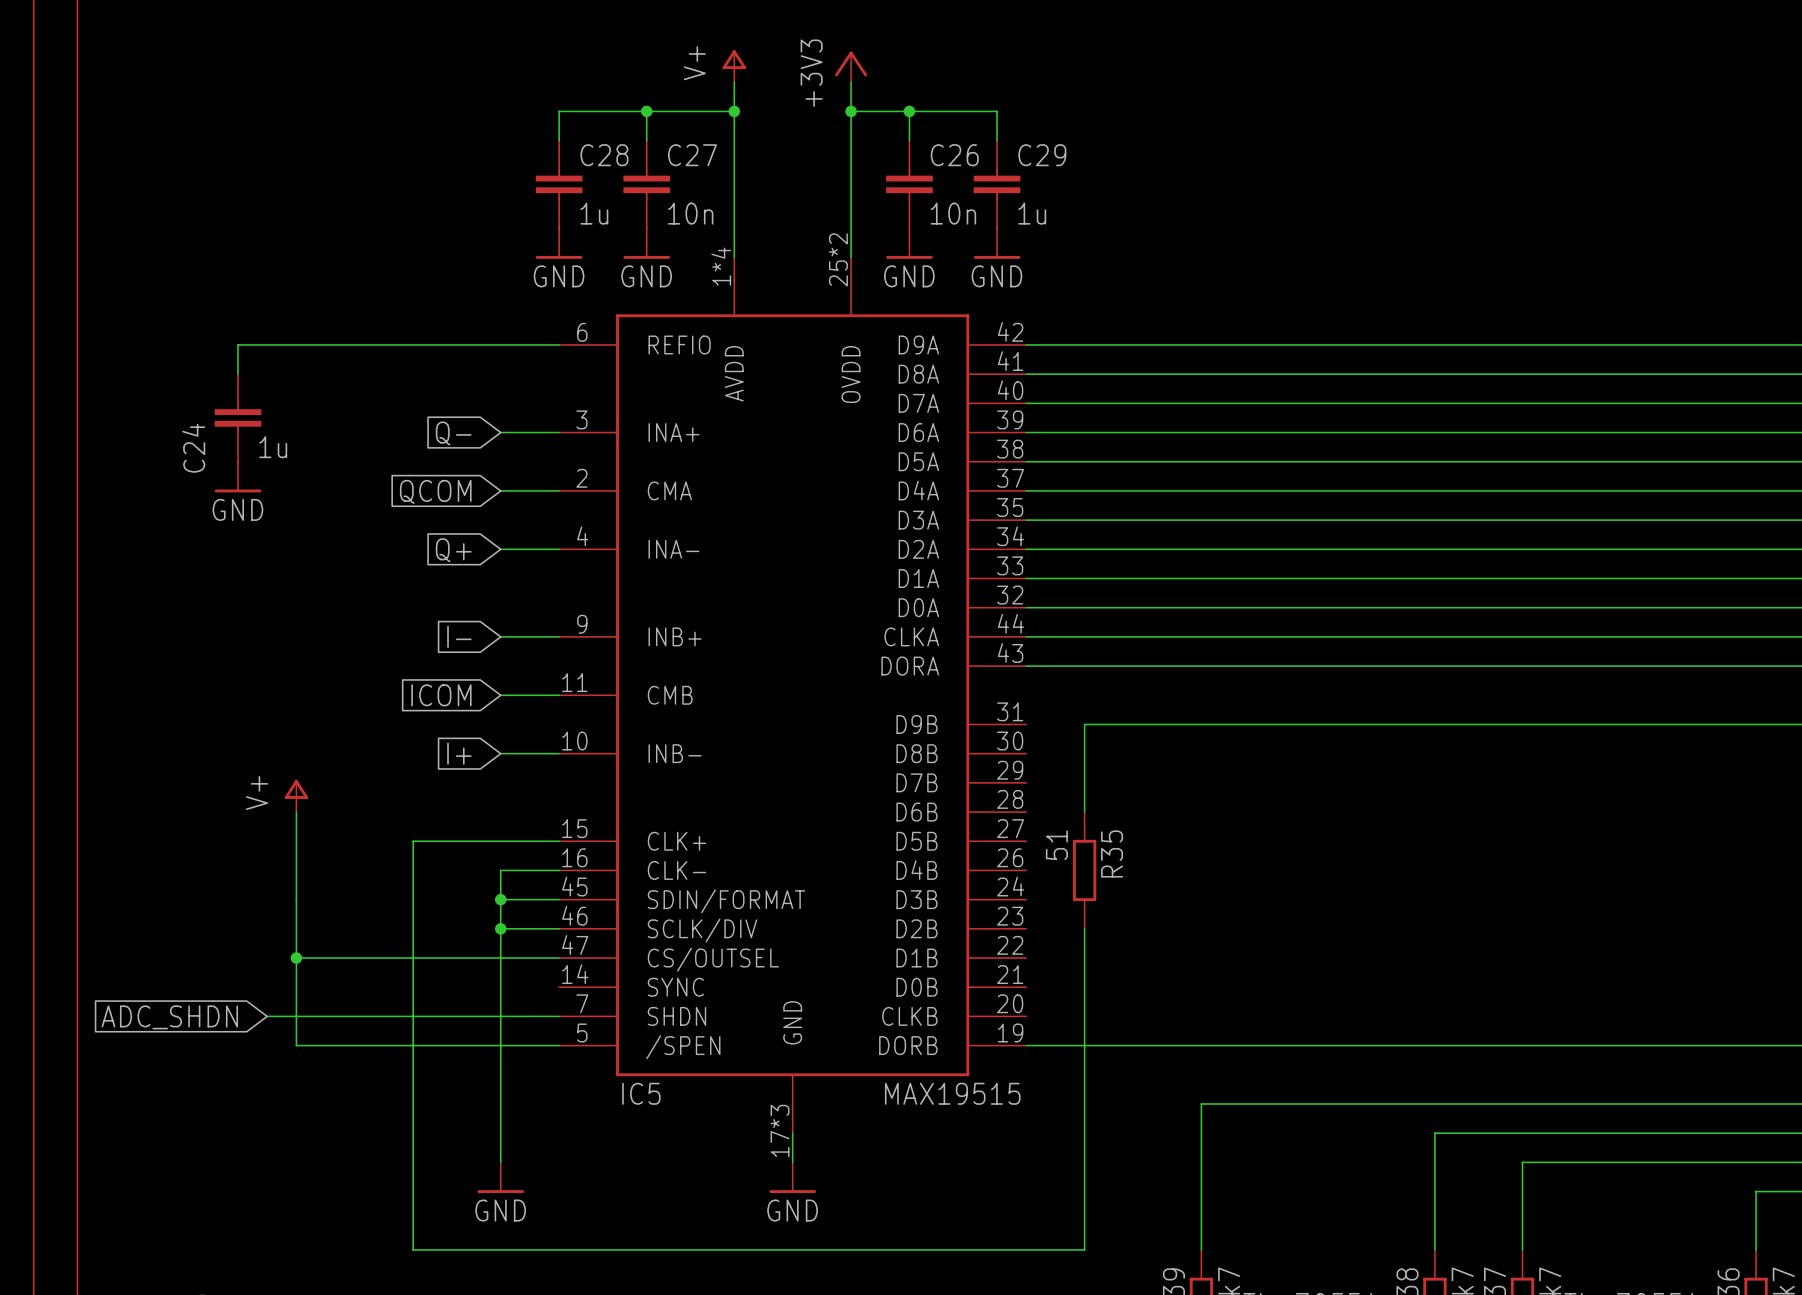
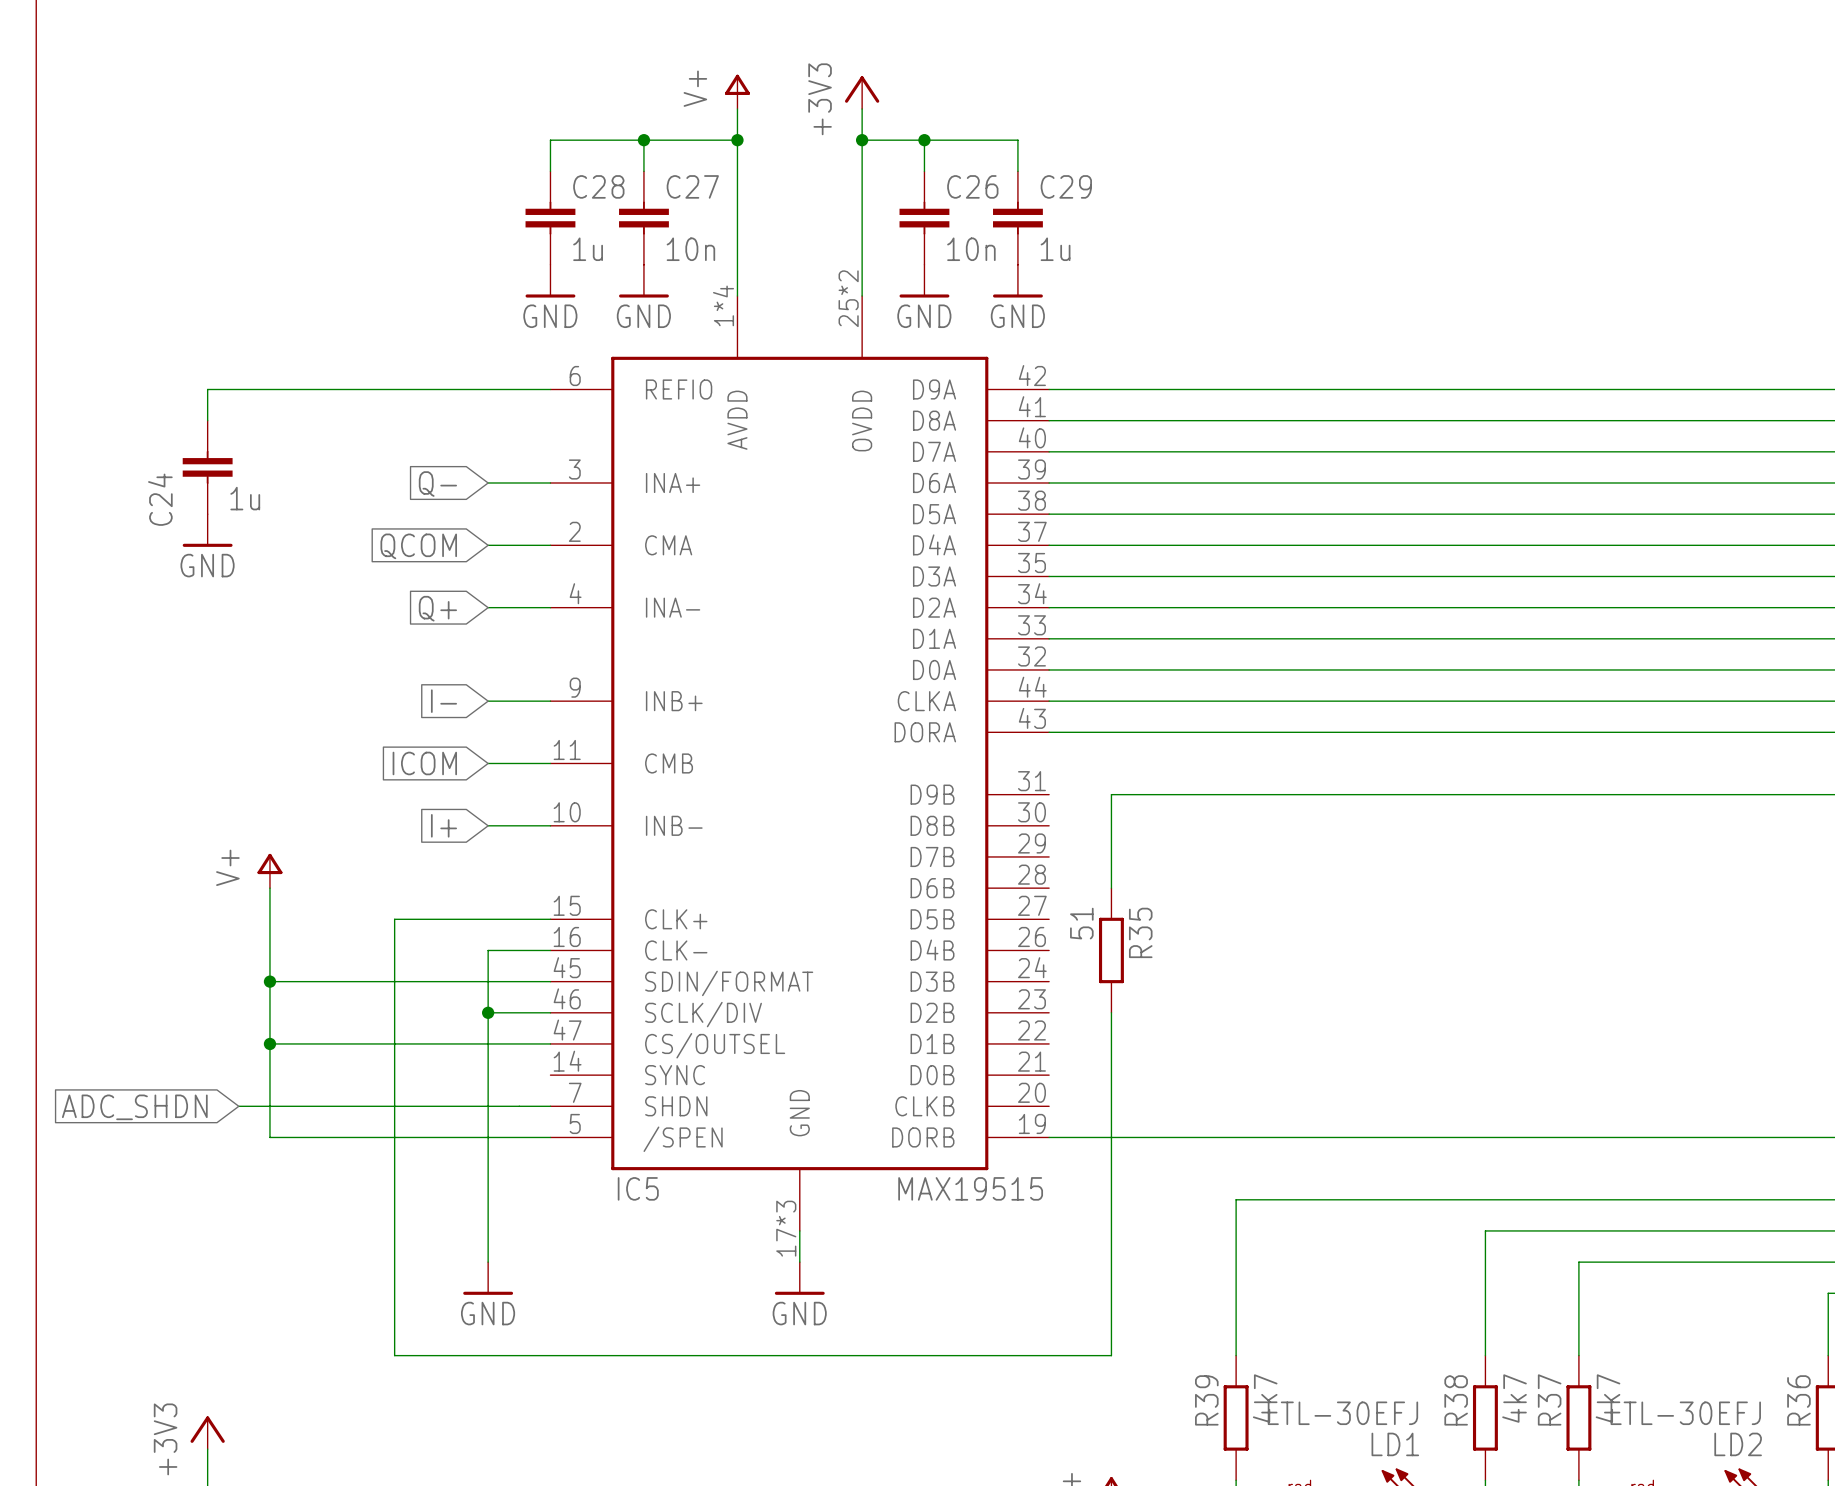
wire: none -> (269, 981) (488, 981)
junction: none -> (269, 981)
junction: (500, 899) -> none

